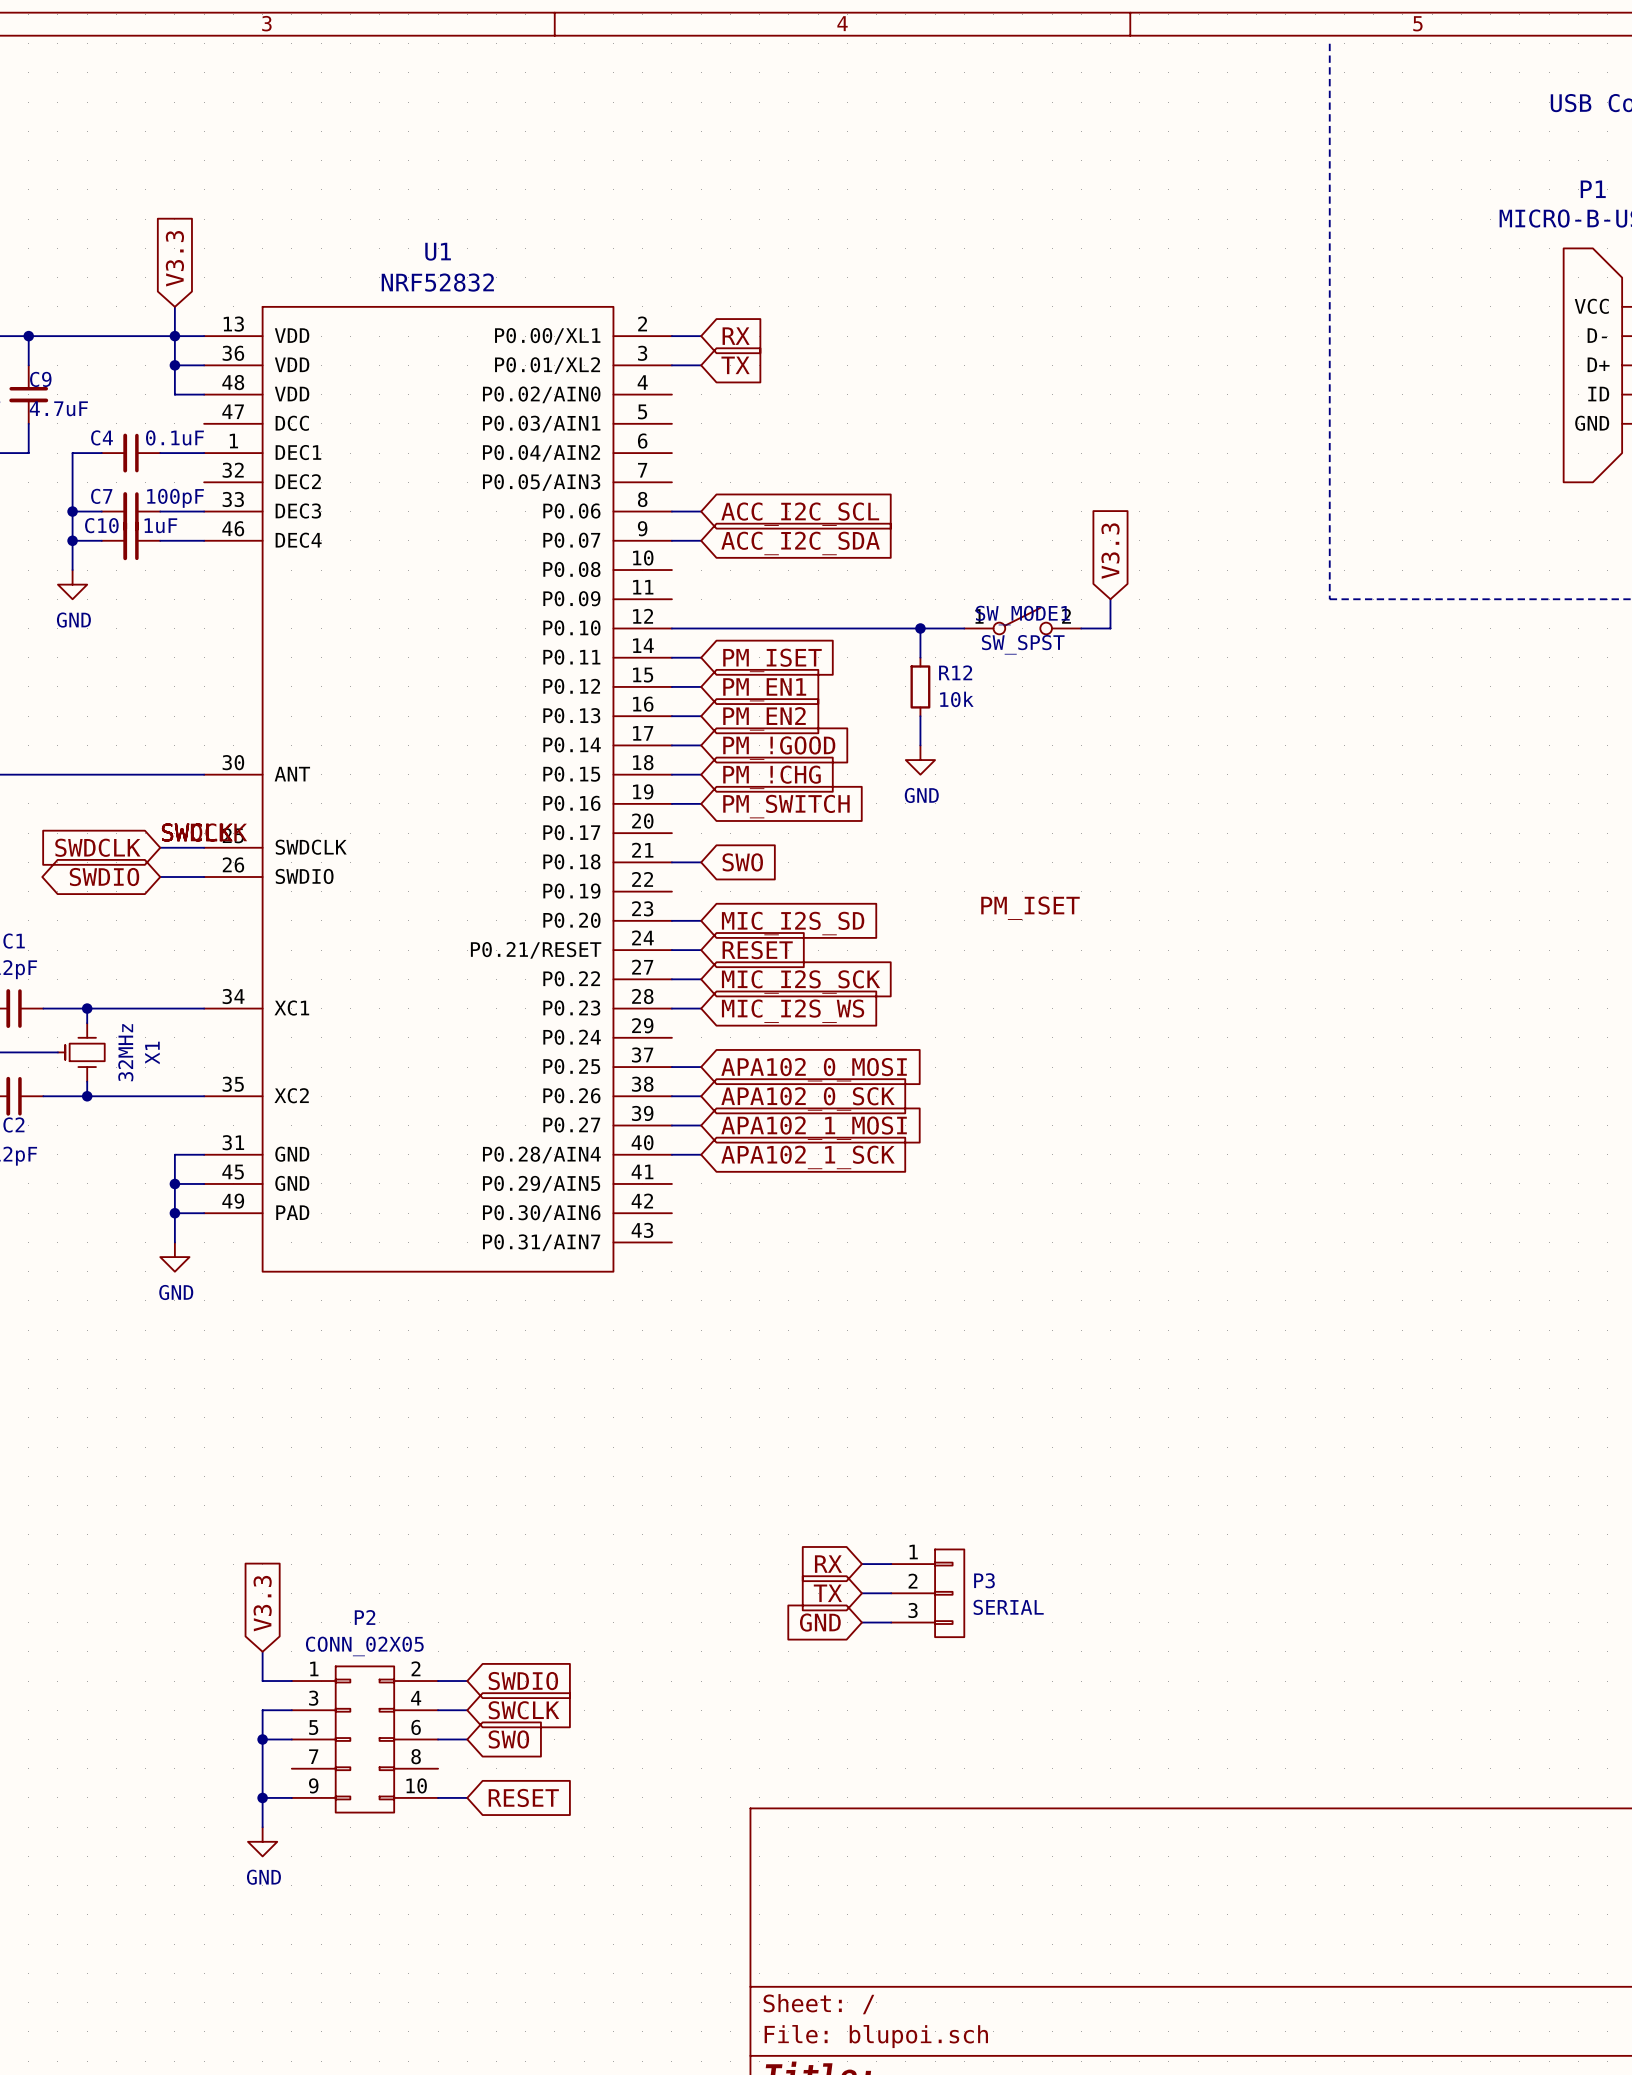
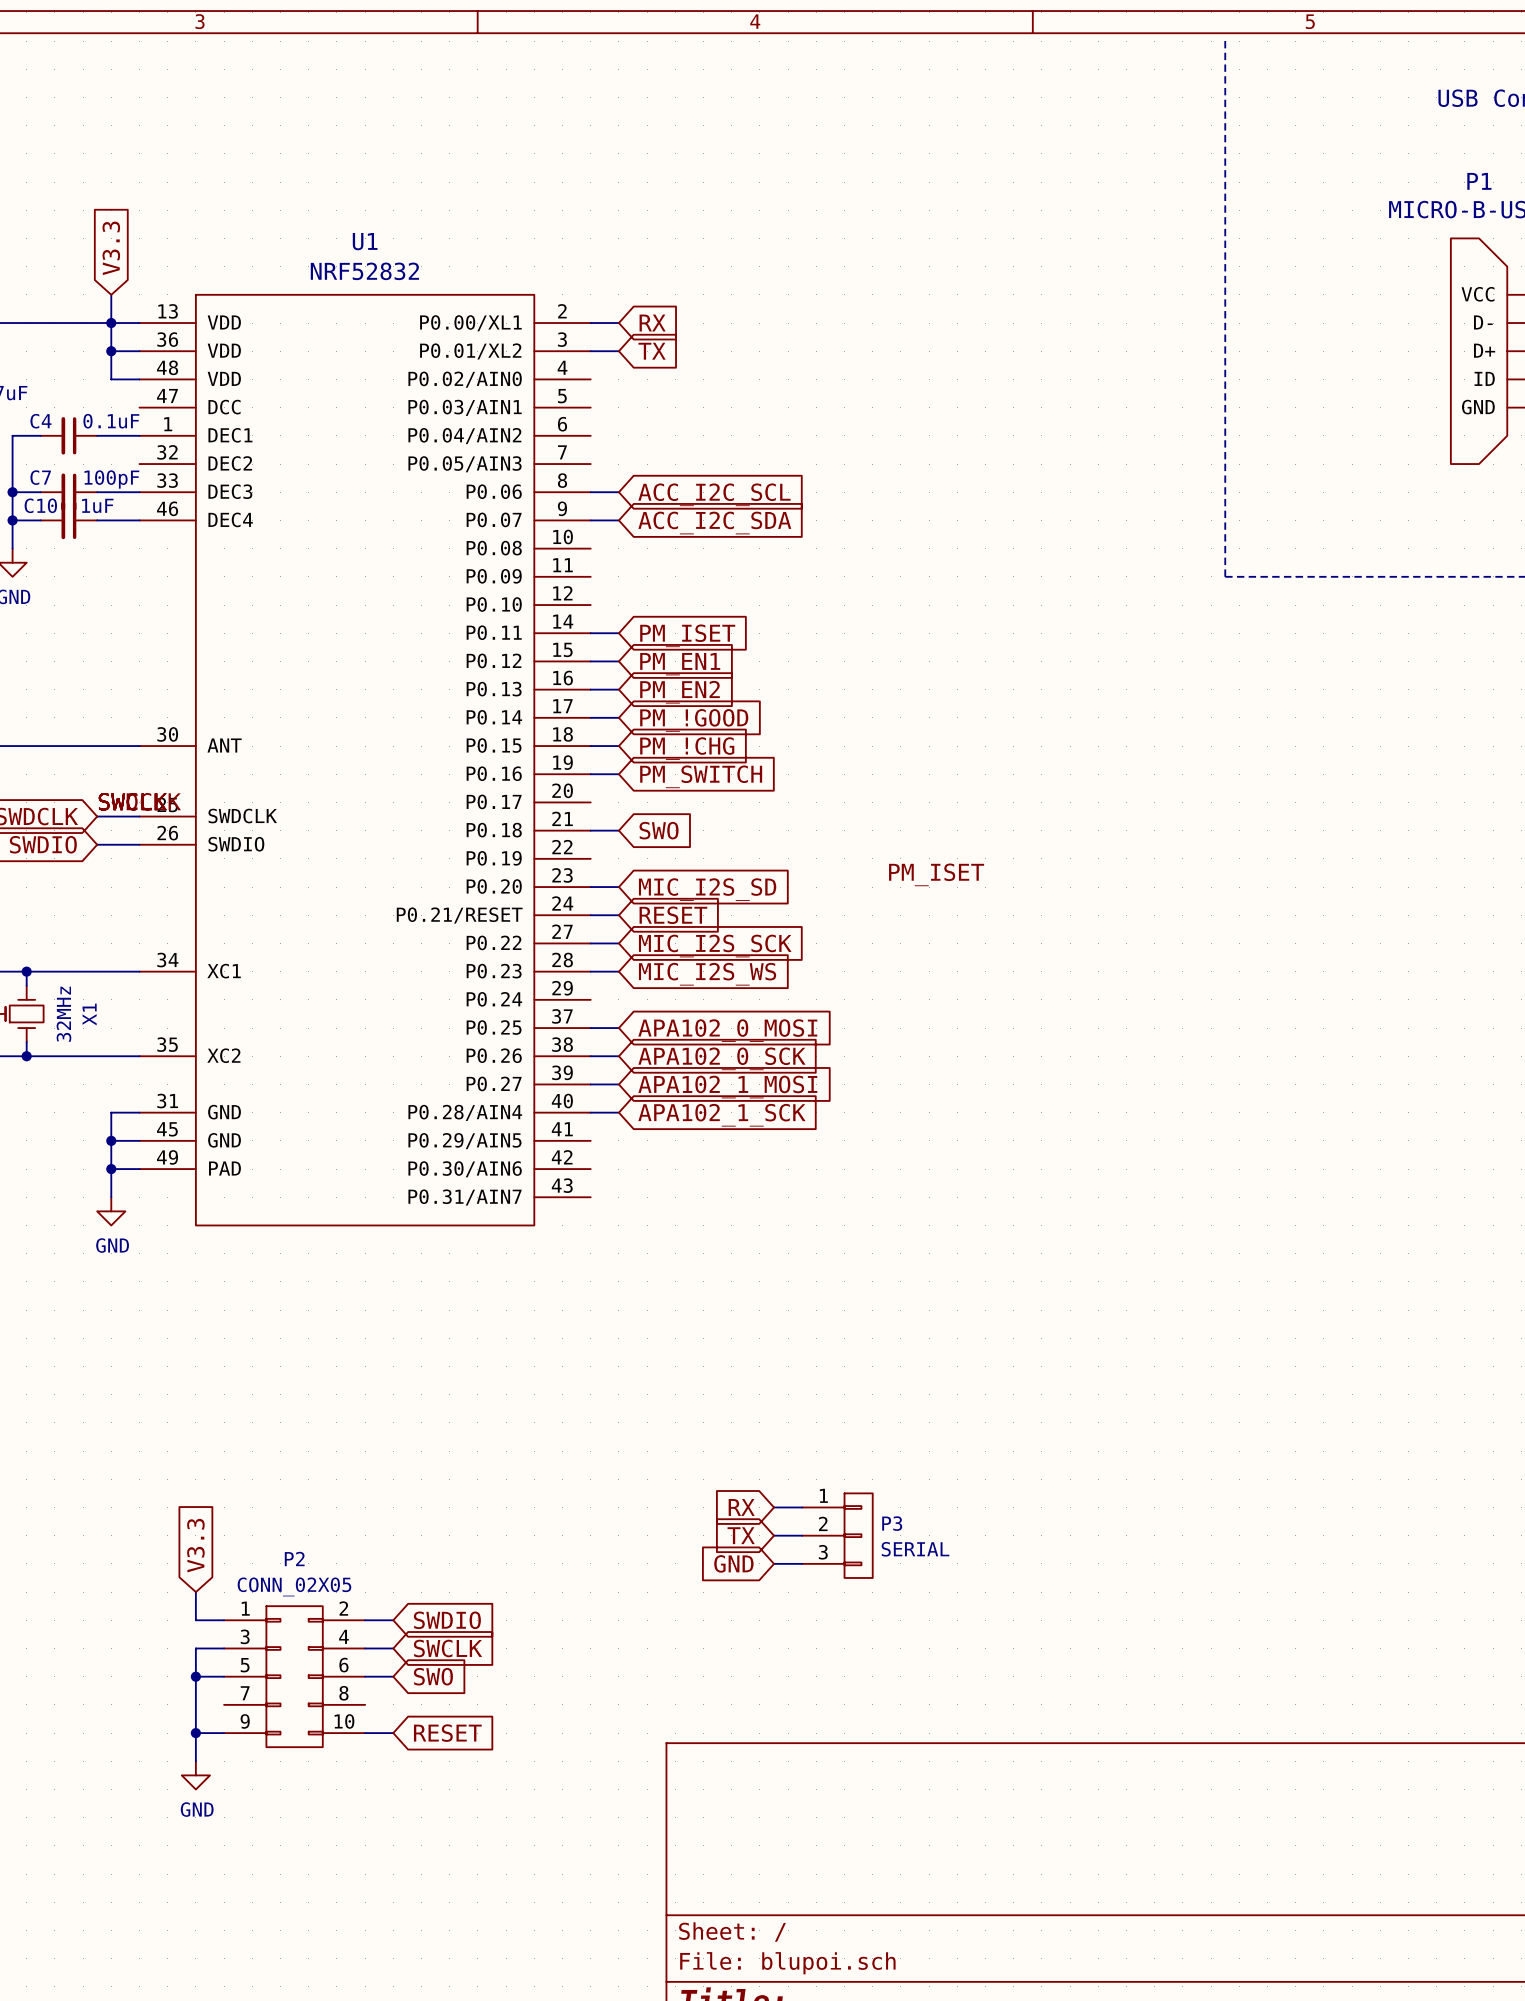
global label: V3.3 (1110, 551) -> none
wire: (1110, 599) (1110, 628) (1081, 628) -> none
SW_MODE1: SW_SPST (1022, 621) -> none
wire: (671, 628) (964, 628) -> none
wire: (920, 628) (920, 657) -> none
junction: (920, 628) -> none
R12: 10k (920, 686) -> none
wire: (920, 716) (920, 745) -> none
power symbol: GND (920, 760) -> none

